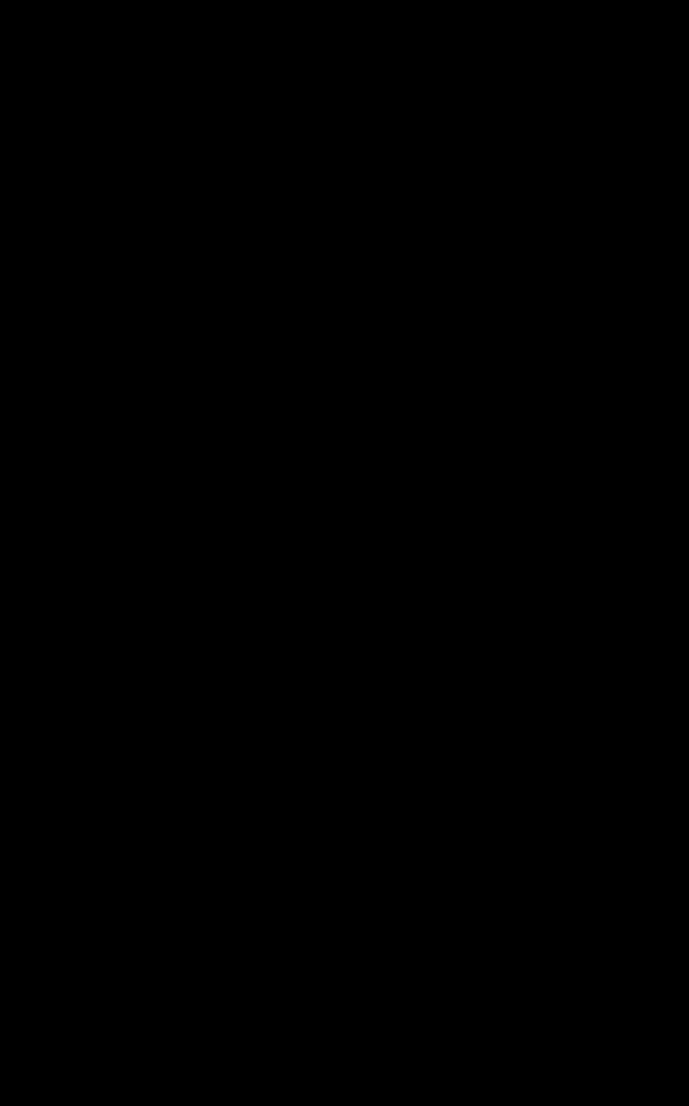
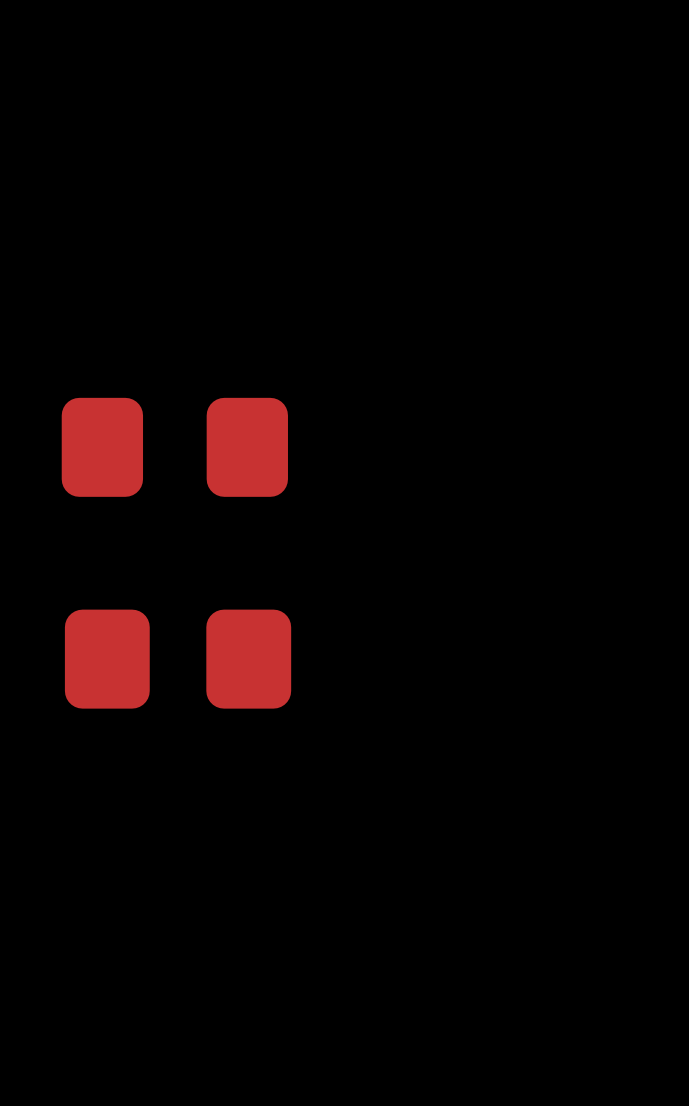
part: none -> (174, 447)
part: none -> (178, 659)

